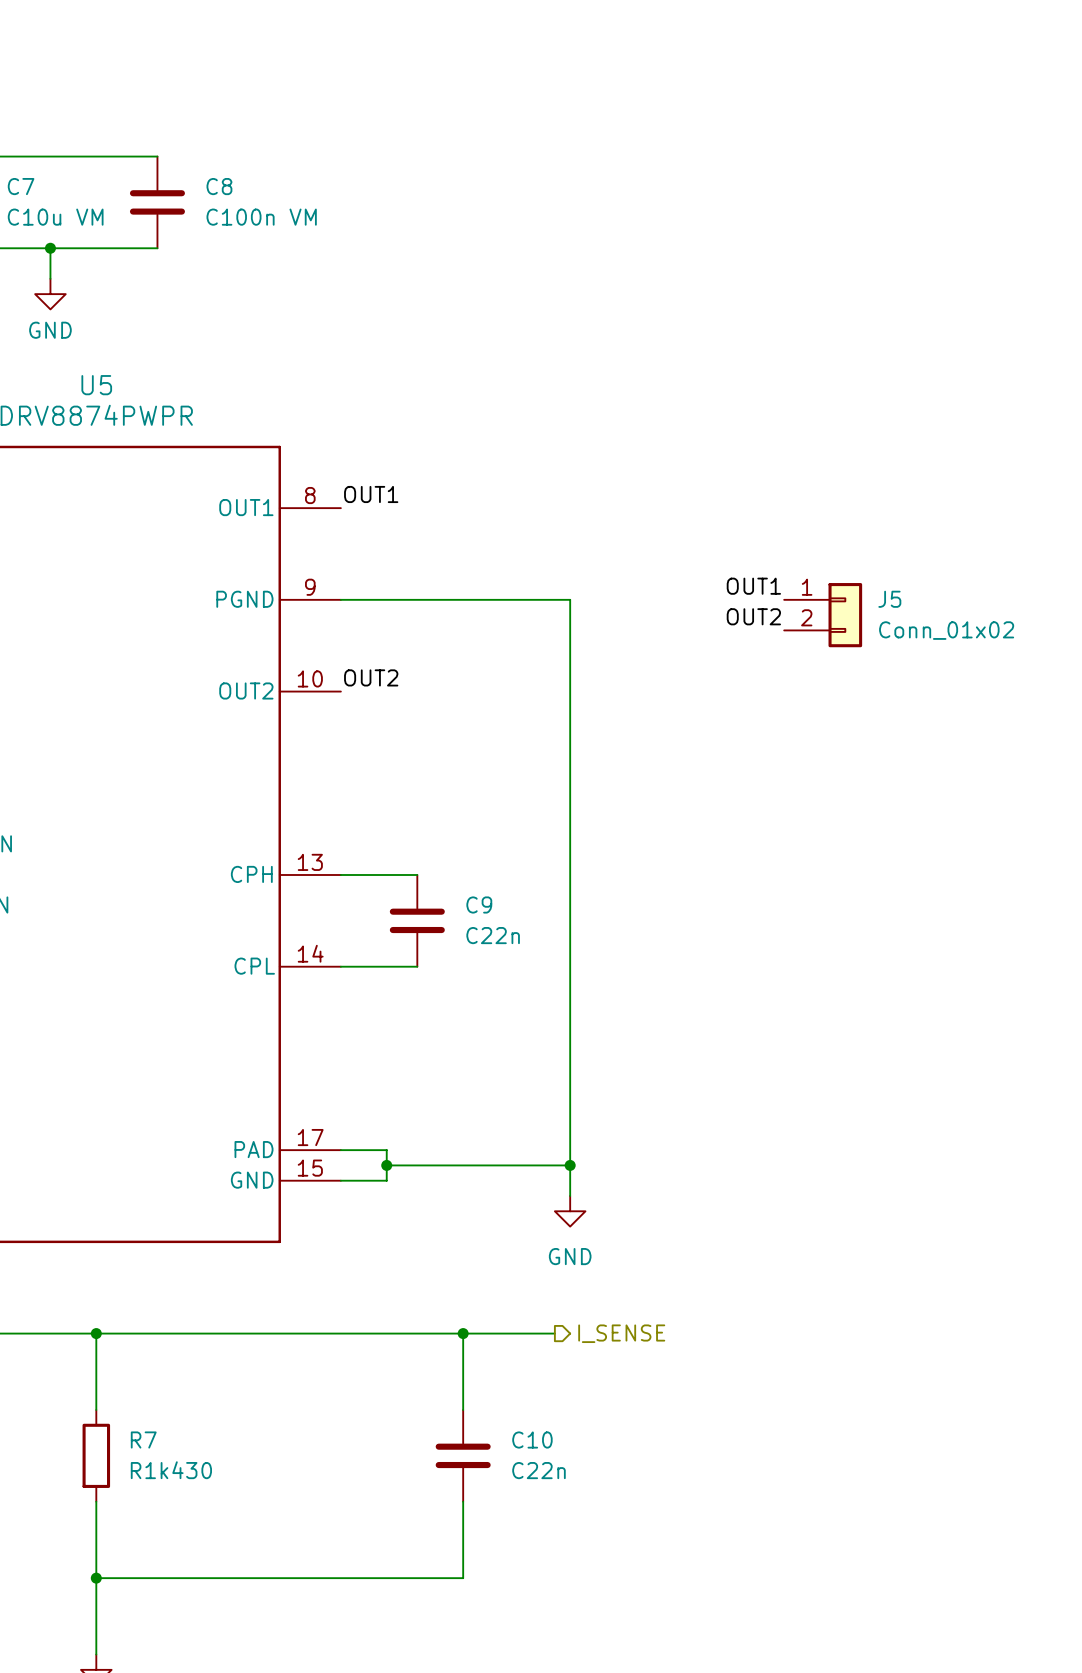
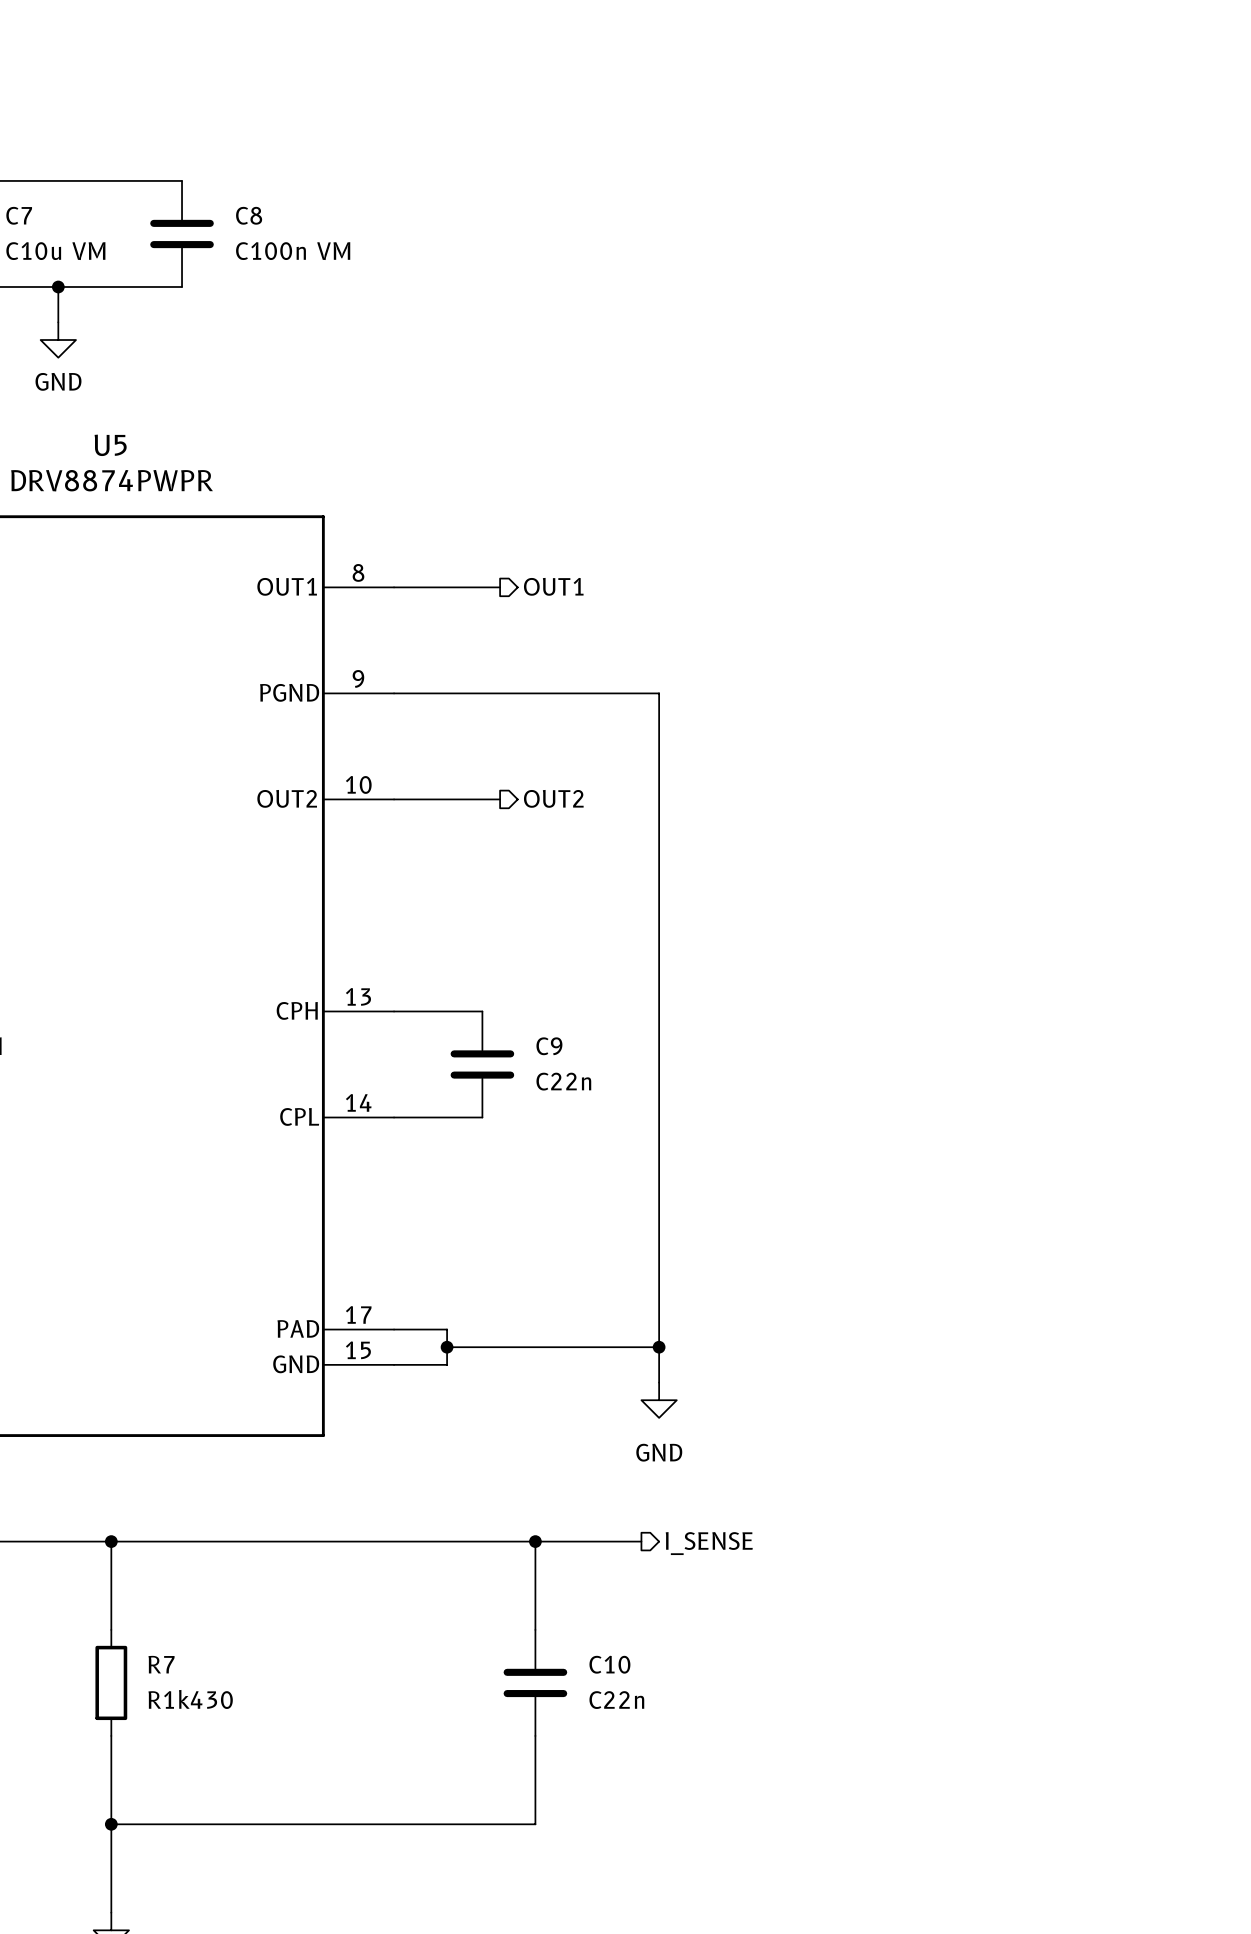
label: OUT1 (371, 494) -> none
hierarchical label: none -> OUT1 (553, 586)
wire: none -> (394, 587) (500, 587)
label: OUT1 (753, 586) -> none
J5: Conn_01x02 (823, 615) -> none
label: OUT2 (753, 616) -> none
label: OUT2 (371, 677) -> none
hierarchical label: none -> OUT2 (553, 798)
wire: none -> (394, 799) (500, 799)

